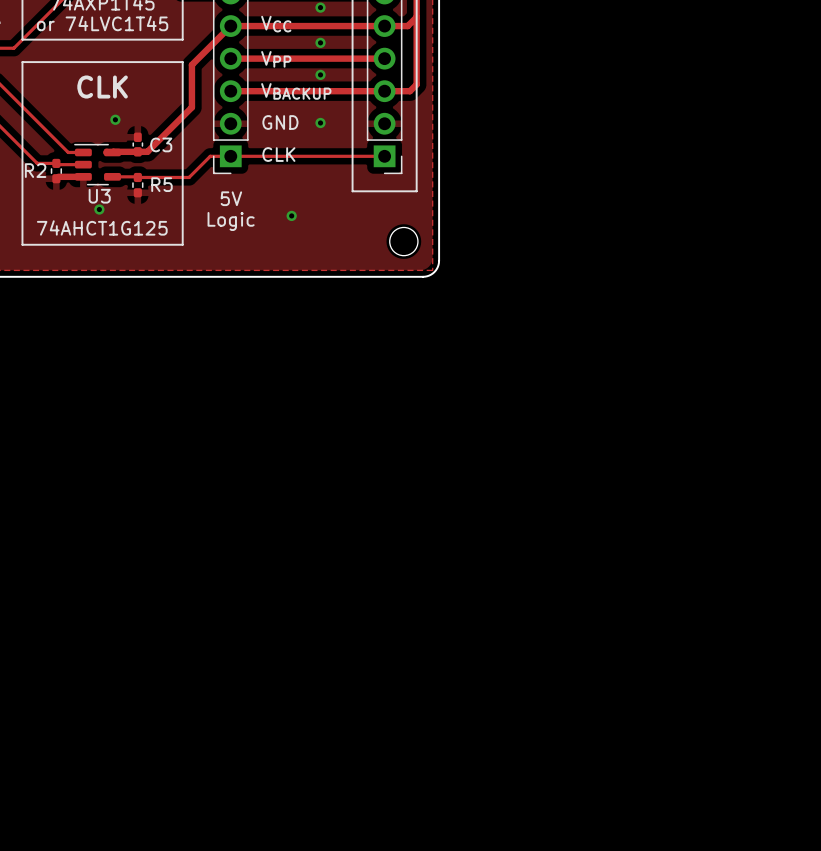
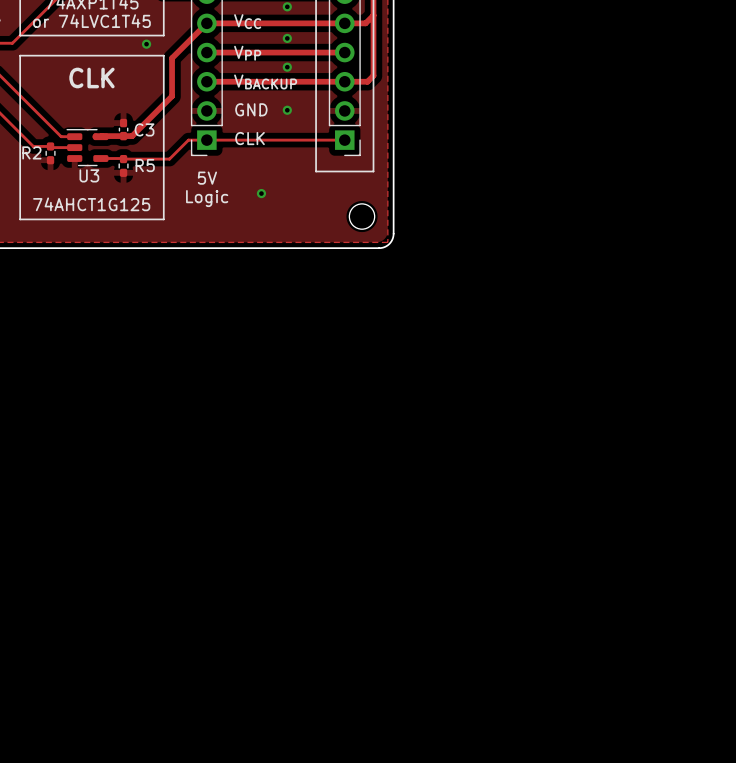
via: none -> (146, 44)
via: (115, 119) -> none
track: (83, 176) (58, 176) (56, 178) -> none
via: (99, 209) -> none

